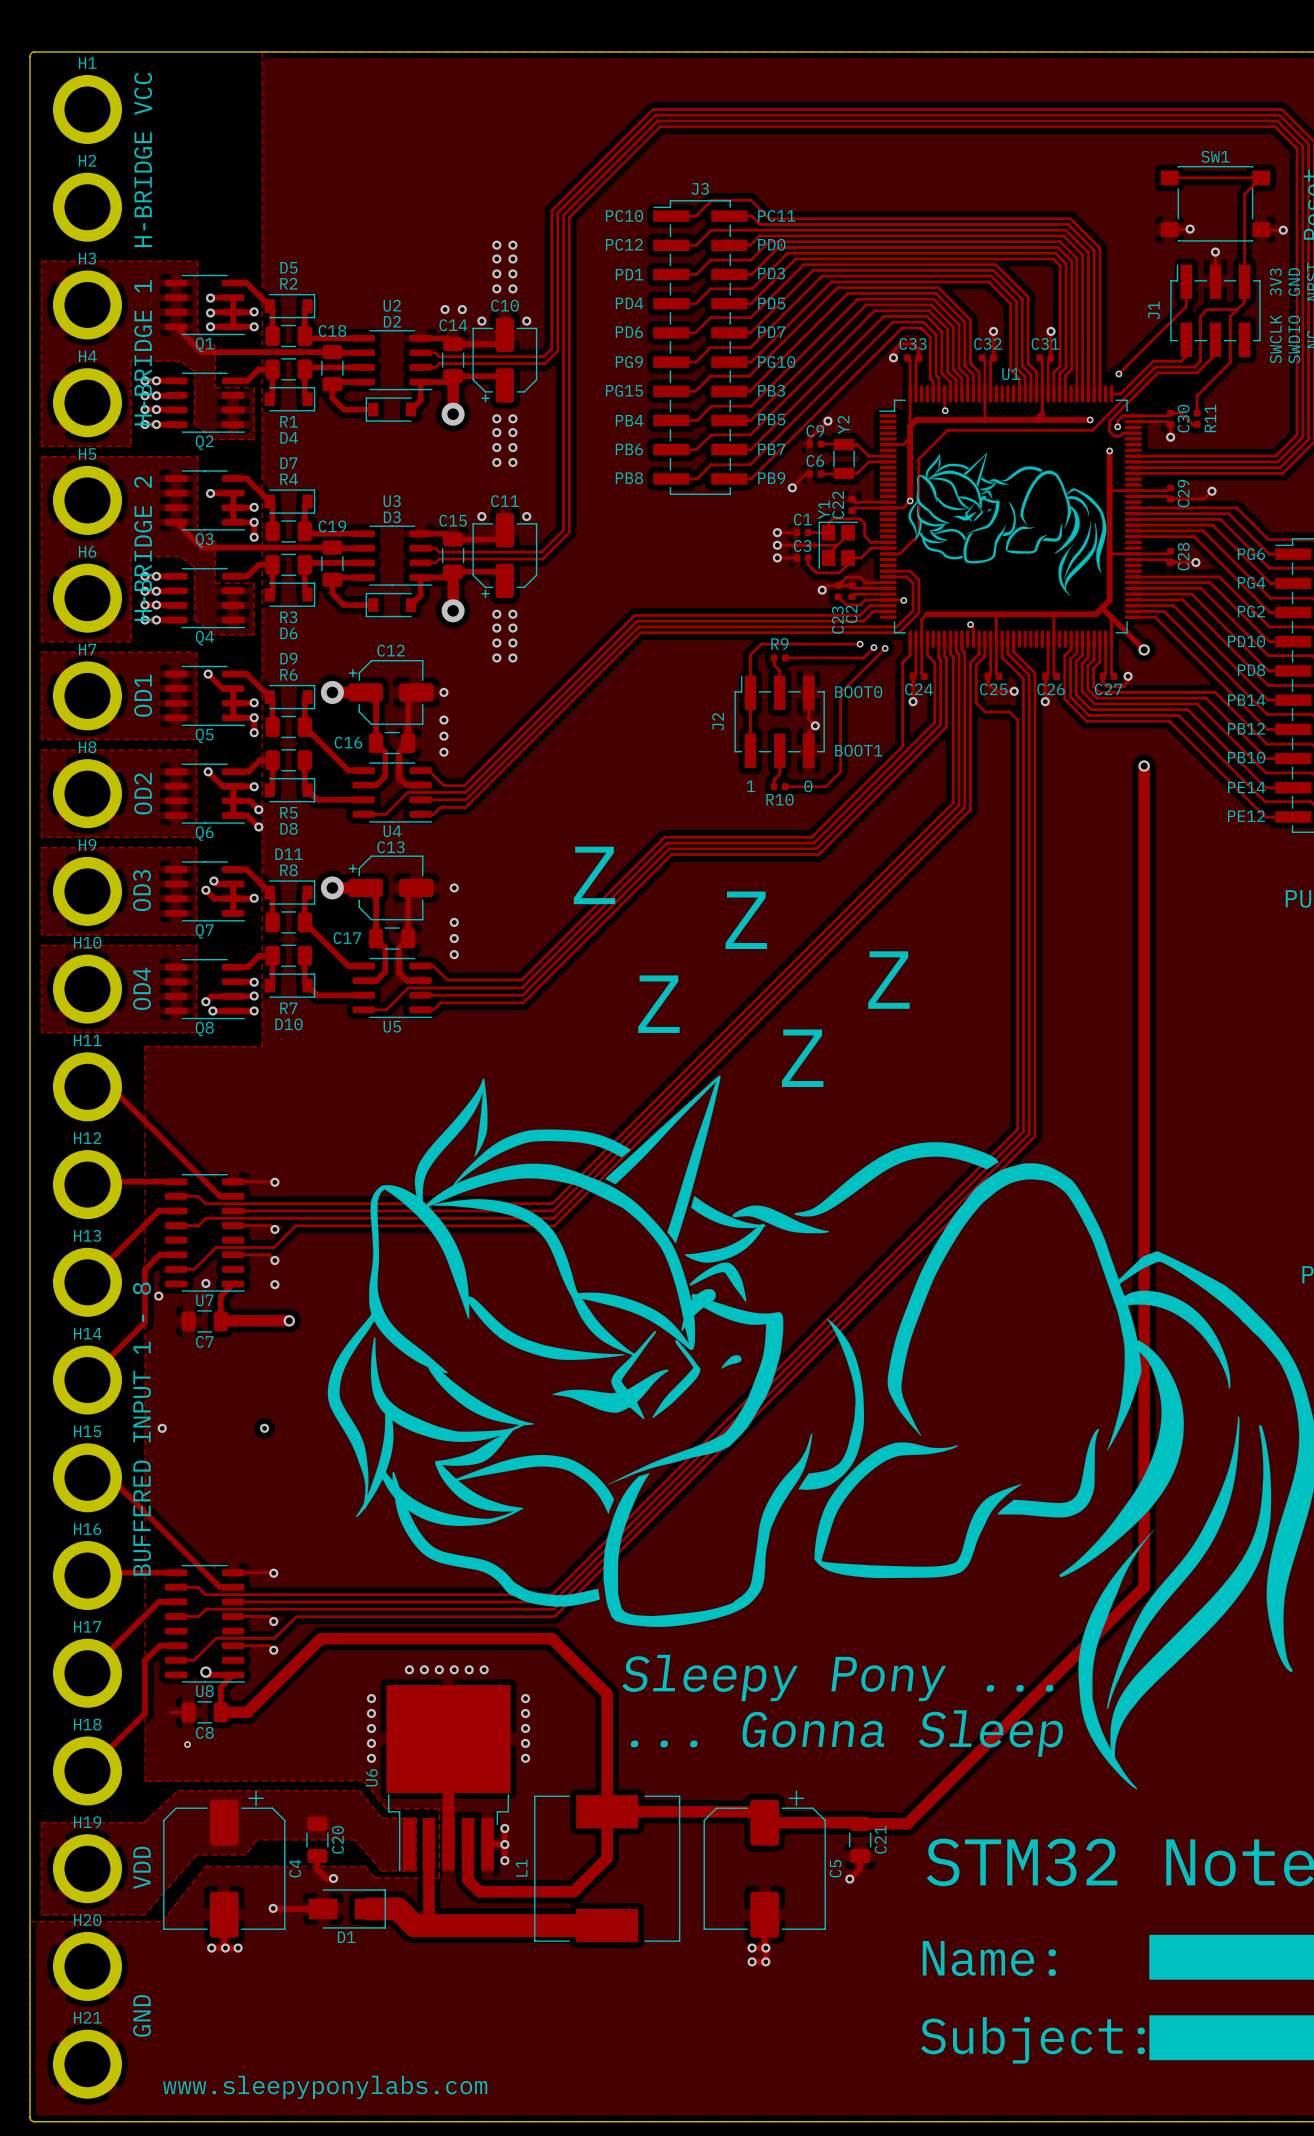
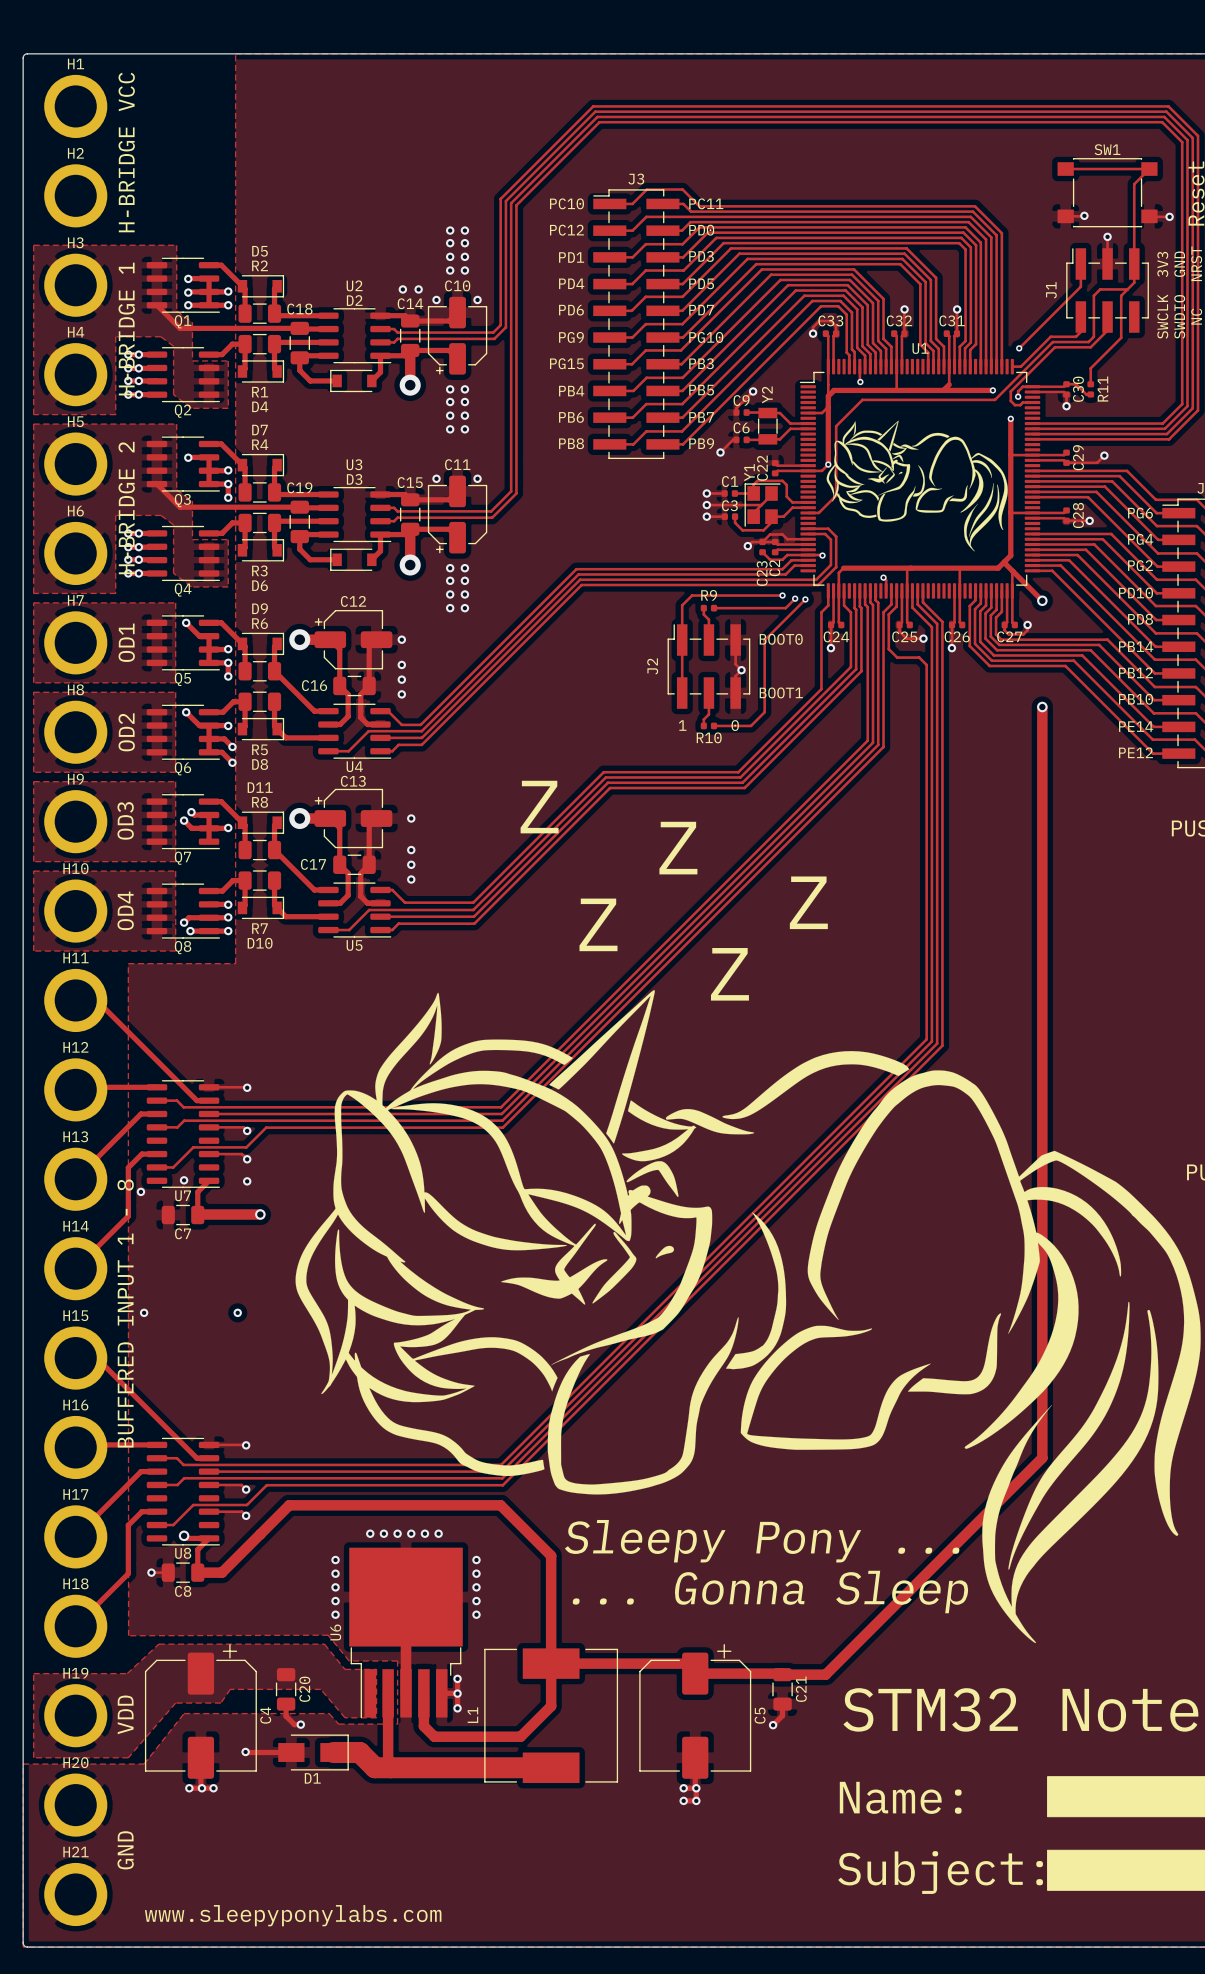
via: none -> (151, 1572)
via: (187, 1744) -> none

